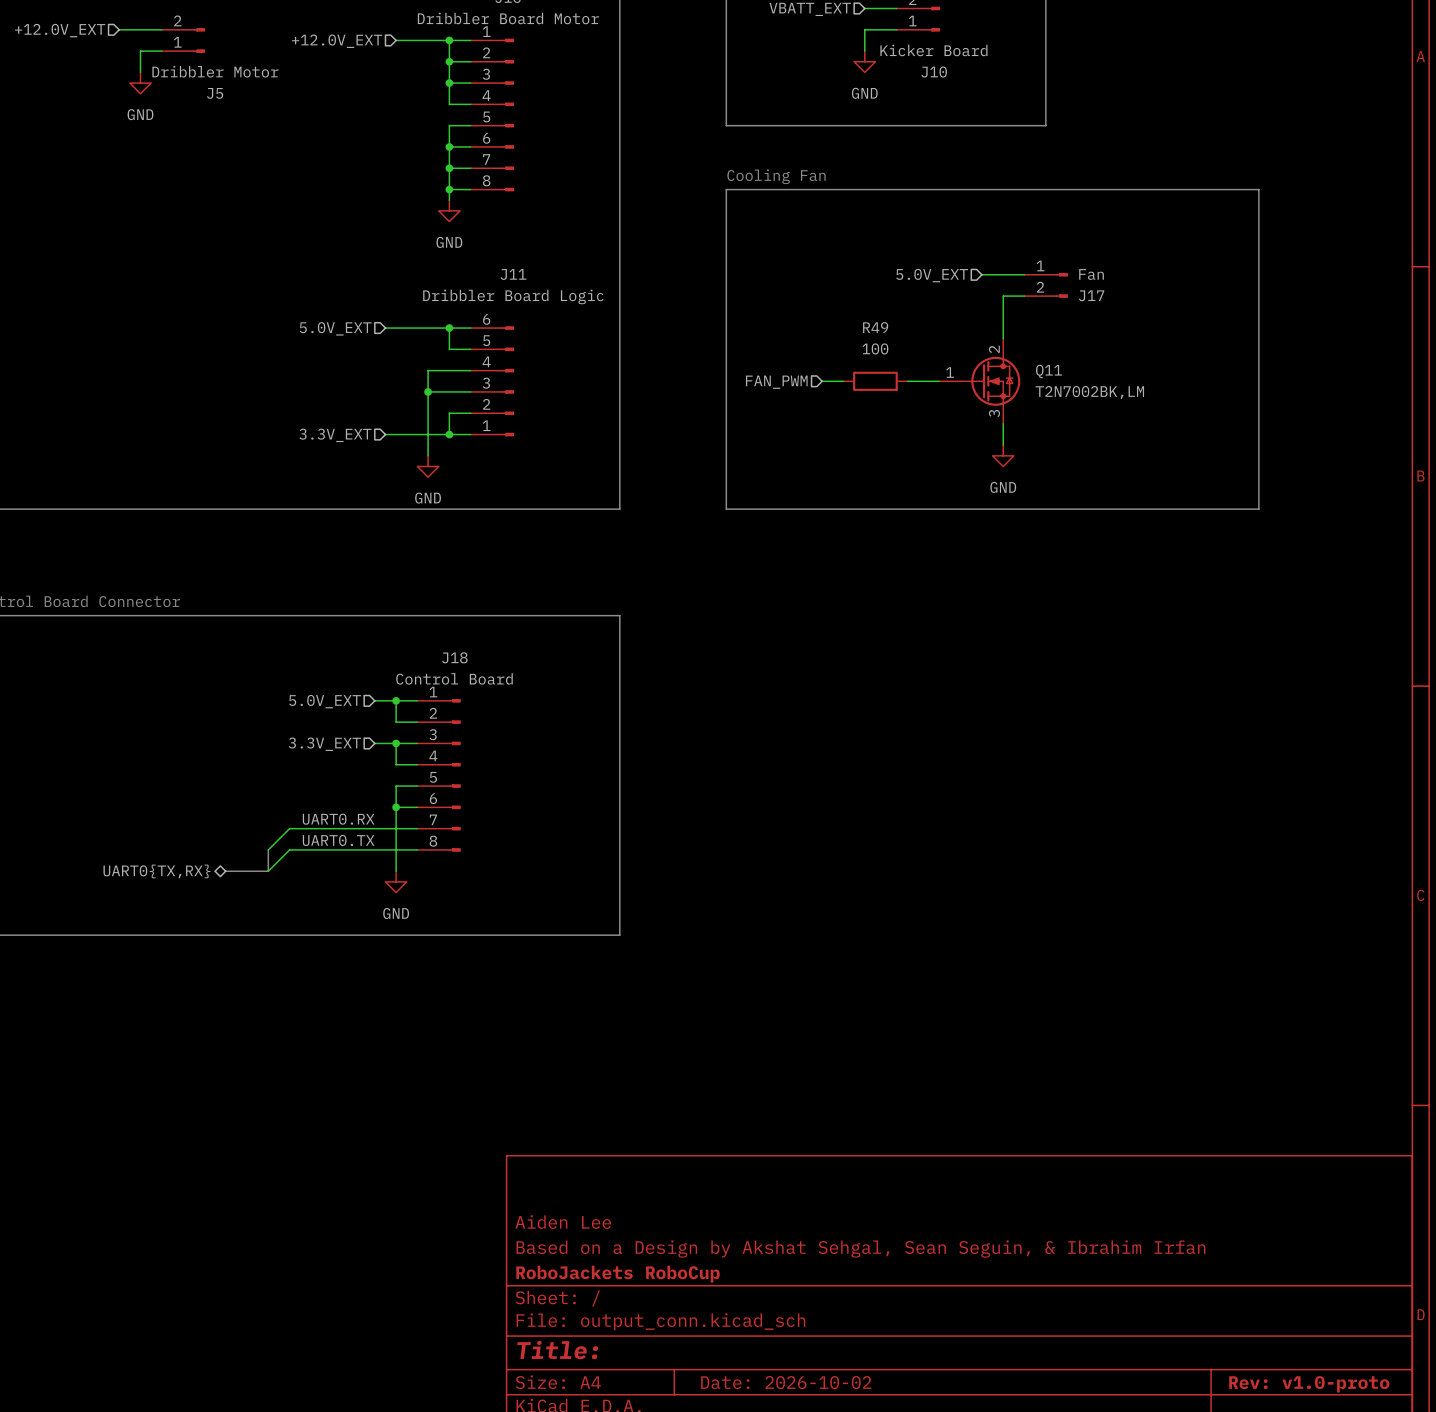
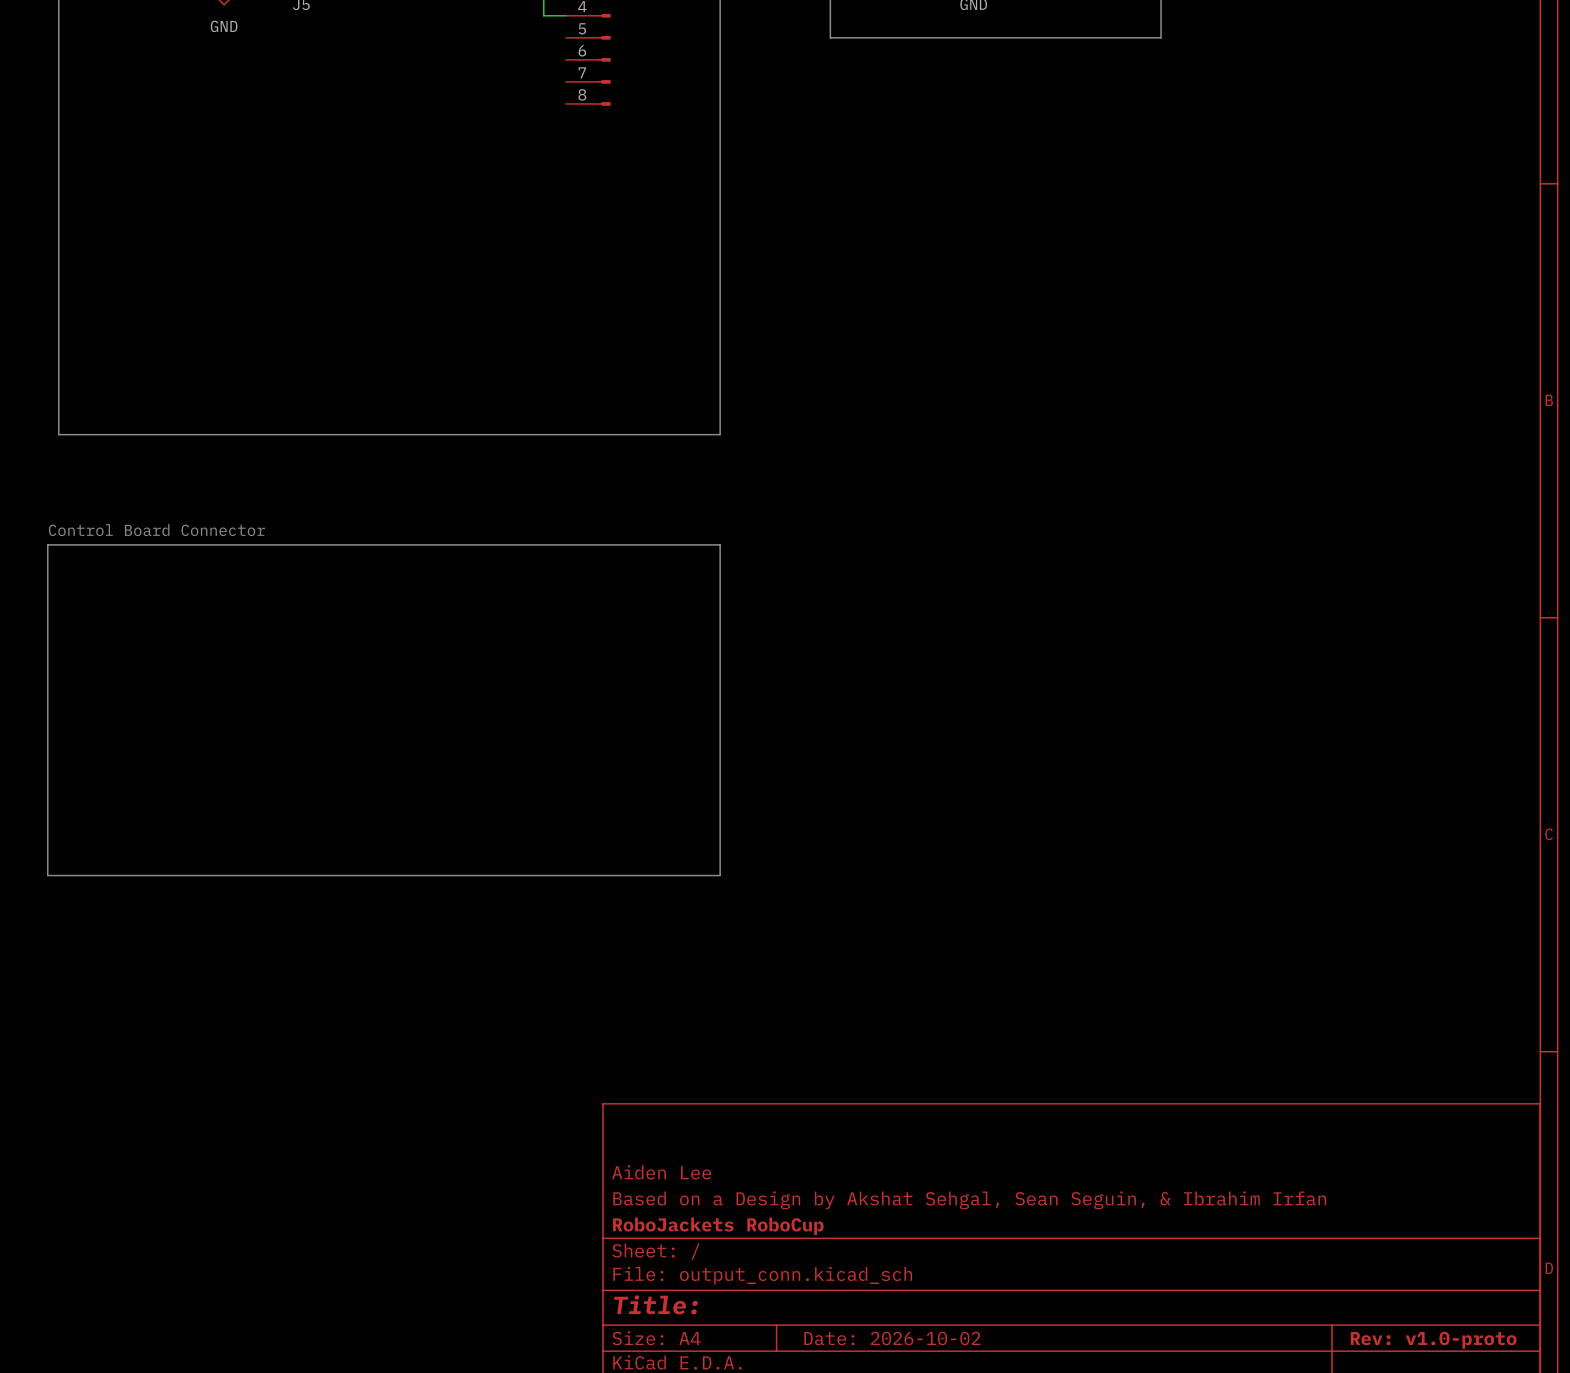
wire: (470, 125) (449, 125) (449, 200) -> none
wire: (449, 146) (470, 146) -> none
junction: (449, 146) -> none
wire: (449, 168) (470, 168) -> none
junction: (449, 168) -> none
text: Cooling Fan (776, 176) -> none
wire: (449, 189) (470, 189) -> none
junction: (449, 189) -> none
line: (726, 189) (1258, 189) (1258, 509) (726, 509) (726, 189) -> none
power symbol: GND (449, 210) -> none
wire: (981, 274) (1024, 274) -> none
hierarchical label: 5.0V_EXT (932, 275) -> none
J17: Fan (1046, 285) -> none
wire: (1024, 296) (1003, 296) (1003, 338) -> none
hierarchical label: 5.0V_EXT (335, 328) -> none
wire: (385, 328) (470, 328) -> none
wire: (449, 328) (449, 349) (470, 349) -> none
junction: (449, 328) -> none
wire: (470, 370) (428, 370) (428, 455) -> none
J11: Dribbler Board Logic (492, 381) -> none
wire: (822, 381) (843, 381) -> none
R49: 100 (875, 381) -> none
wire: (907, 381) (939, 381) -> none
Q11: T2N7002BK,LM (979, 381) -> none
hierarchical label: FAN_PWM (776, 382) -> none
wire: (428, 391) (470, 391) -> none
junction: (428, 391) -> none
wire: (470, 413) (449, 413) (449, 434) -> none
wire: (1003, 423) (1003, 445) -> none
wire: (385, 434) (470, 434) -> none
junction: (449, 434) -> none
hierarchical label: 3.3V_EXT (335, 435) -> none
power symbol: GND (1003, 455) -> none
power symbol: GND (428, 466) -> none
wire: (374, 700) (417, 700) -> none
wire: (396, 700) (396, 722) (417, 722) -> none
junction: (396, 700) -> none
hierarchical label: 5.0V_EXT (325, 701) -> none
wire: (374, 743) (417, 743) -> none
wire: (396, 743) (396, 764) (417, 764) -> none
junction: (396, 743) -> none
hierarchical label: 3.3V_EXT (324, 744) -> none
J18: Control Board (439, 775) -> none
wire: (417, 786) (396, 786) (396, 871) -> none
wire: (396, 807) (417, 807) -> none
junction: (396, 807) -> none
label: UART0.RX (338, 819) -> none
wire: (417, 828) (289, 828) (268, 849) -> none
label: UART0.TX (338, 840) -> none
bus: (268, 849) (268, 871) (225, 871) -> none
wire: (417, 849) (289, 849) (268, 871) -> none
hierarchical label: UART0{TX,RX} (157, 871) -> none
power symbol: GND (396, 881) -> none

